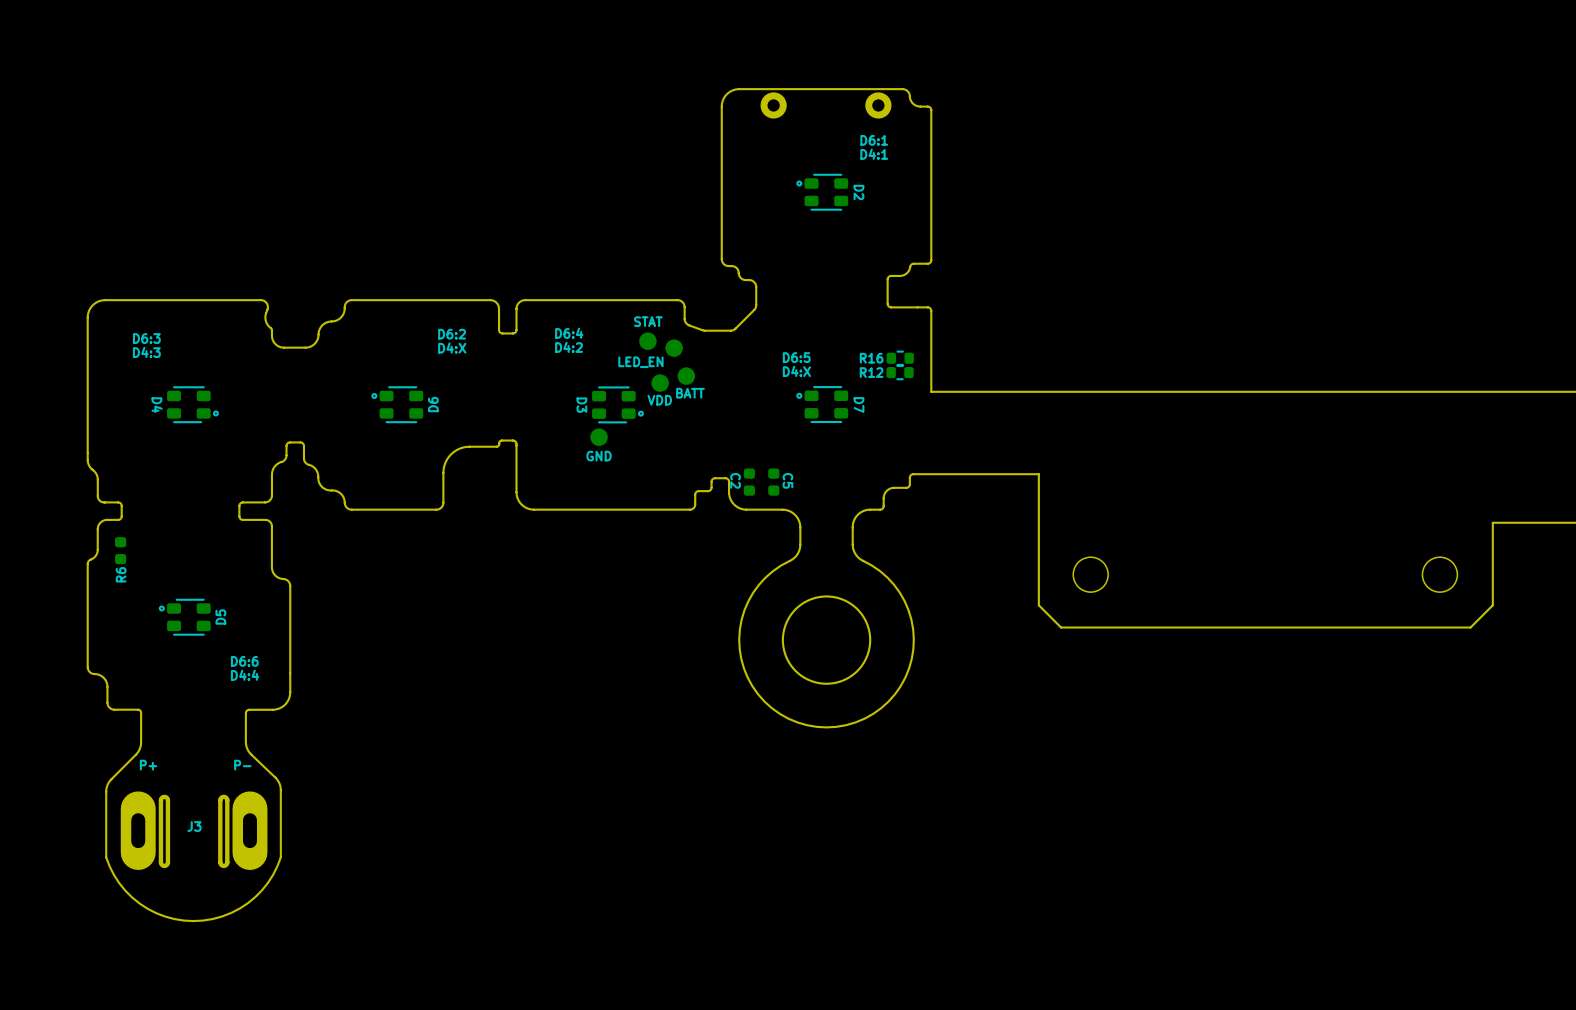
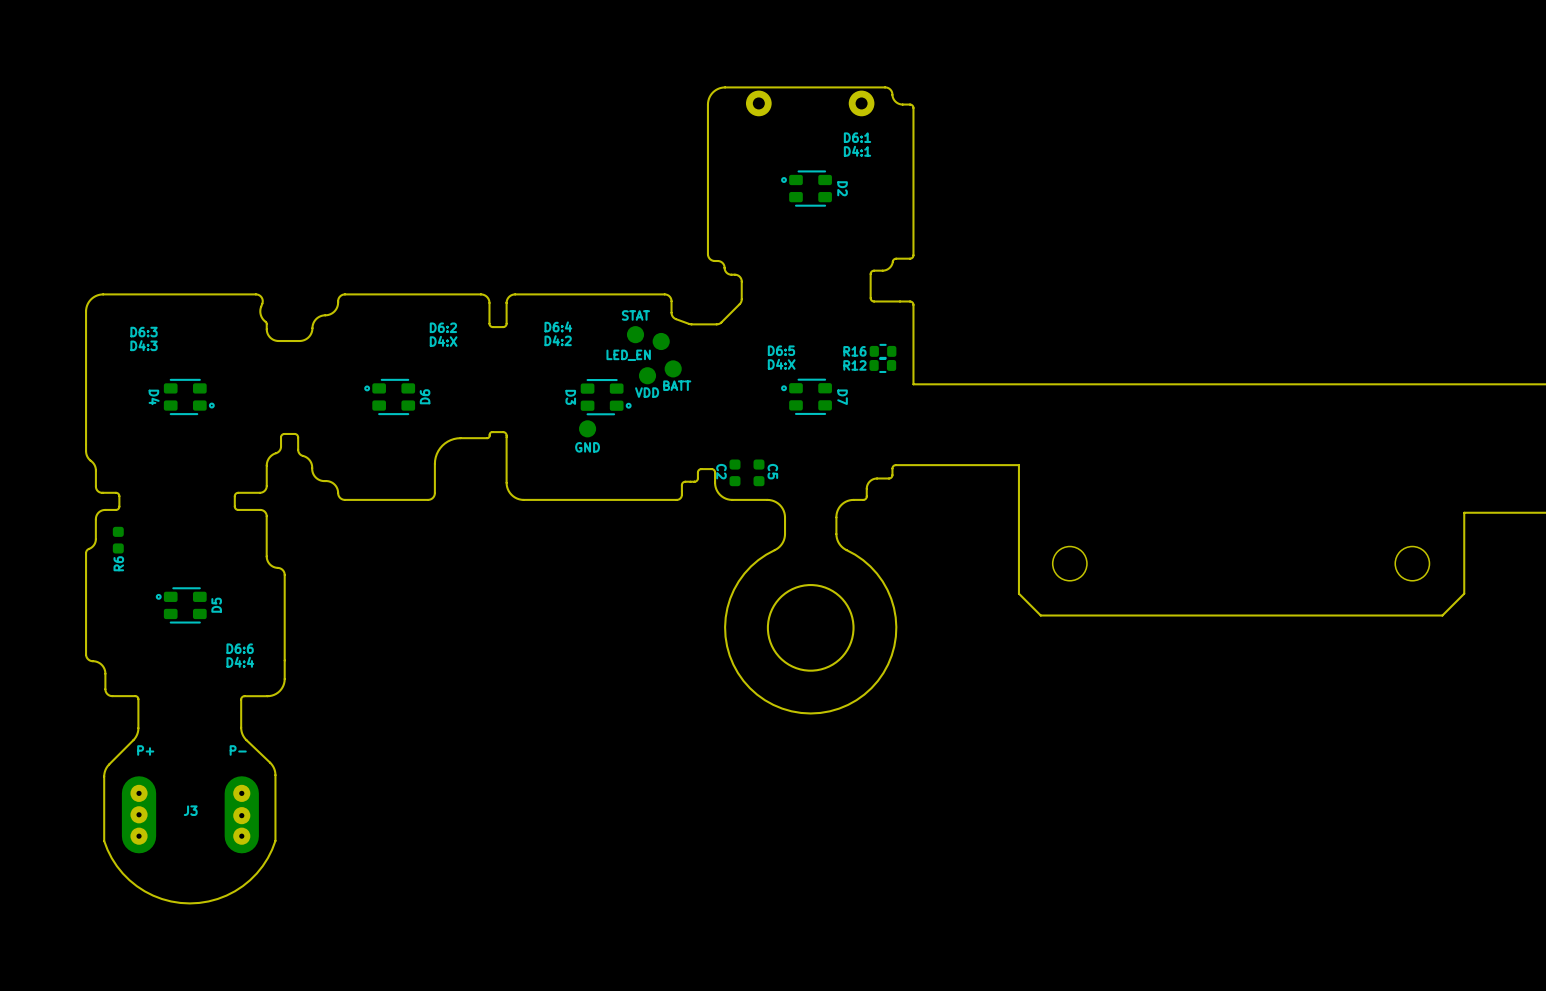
J3 footprint: [120, 791, 268, 870] -> [121, 776, 259, 854]
board edge: (167, 800) (167, 862) (164, 865) (160, 862) (160, 800) (164, 796) (167, 800) -> none
board edge: (227, 800) (227, 862) (223, 865) (220, 862) (220, 800) (223, 796) (227, 800) -> none

